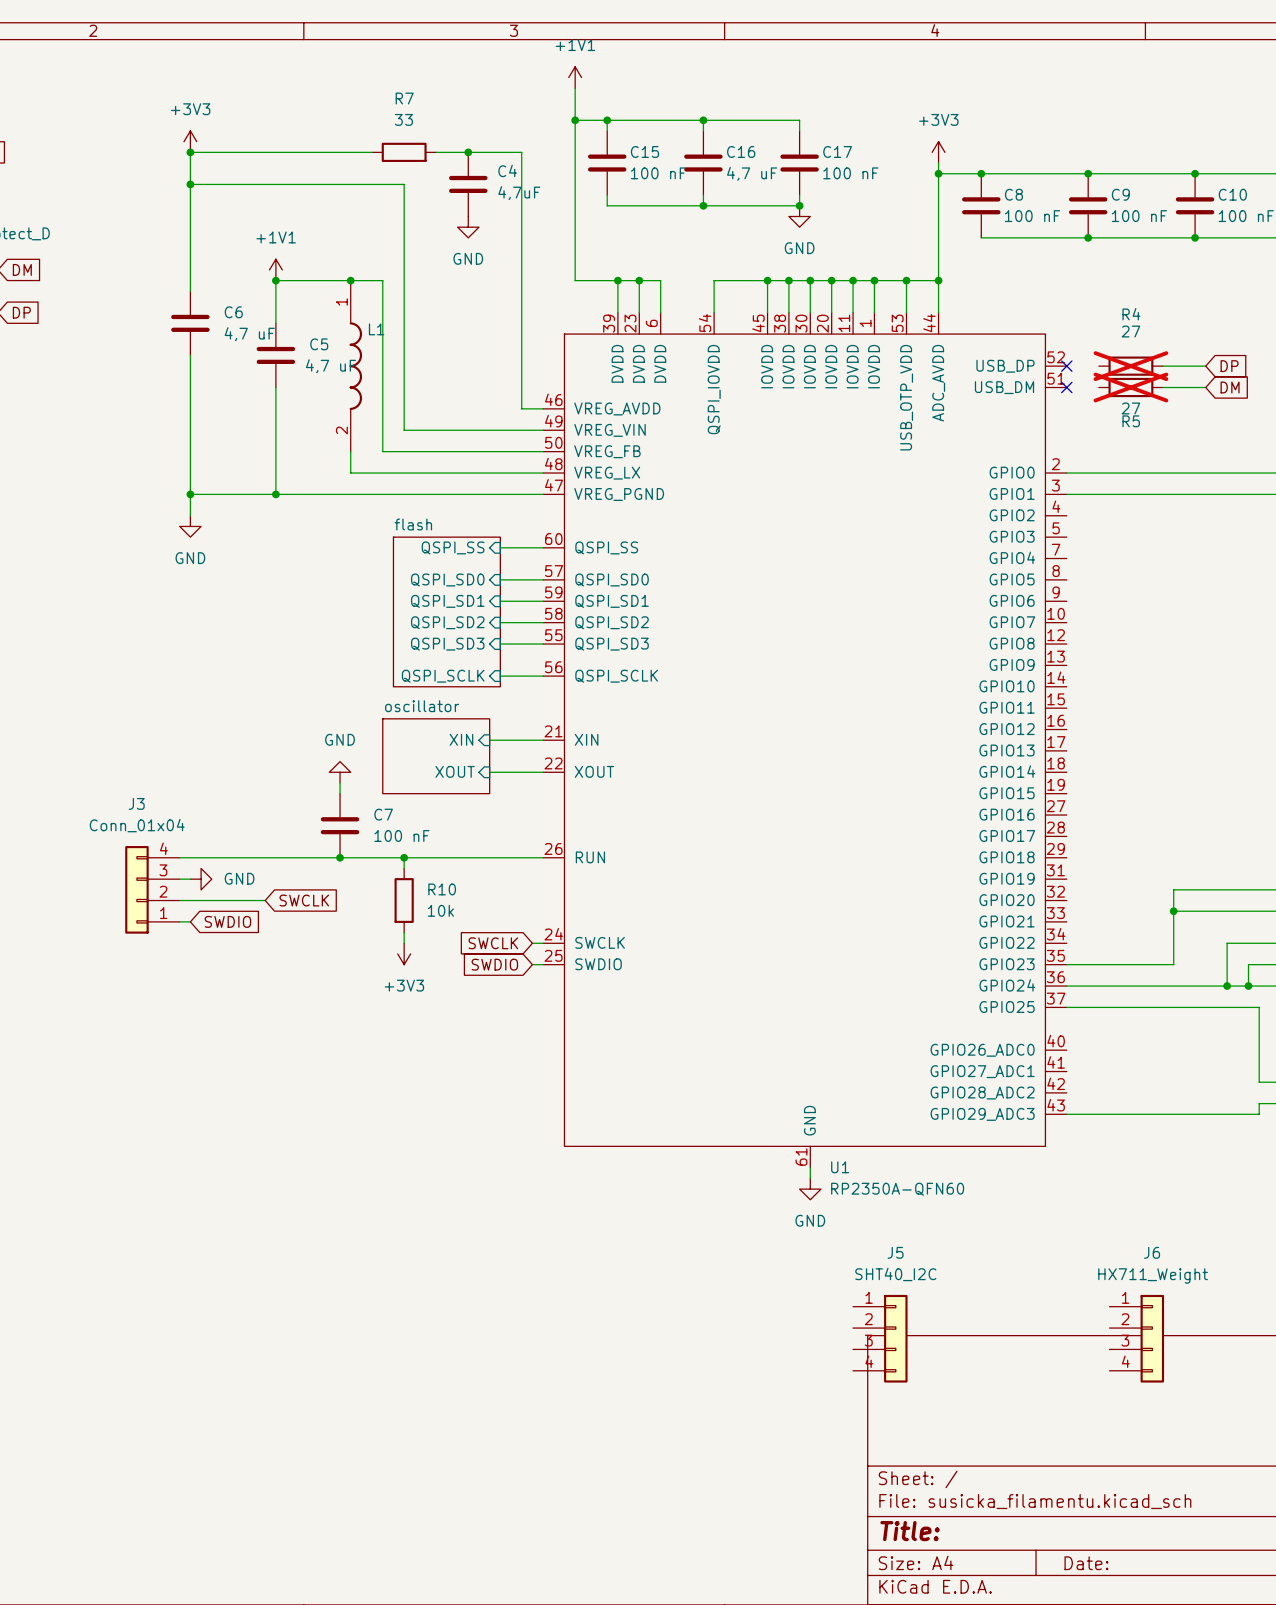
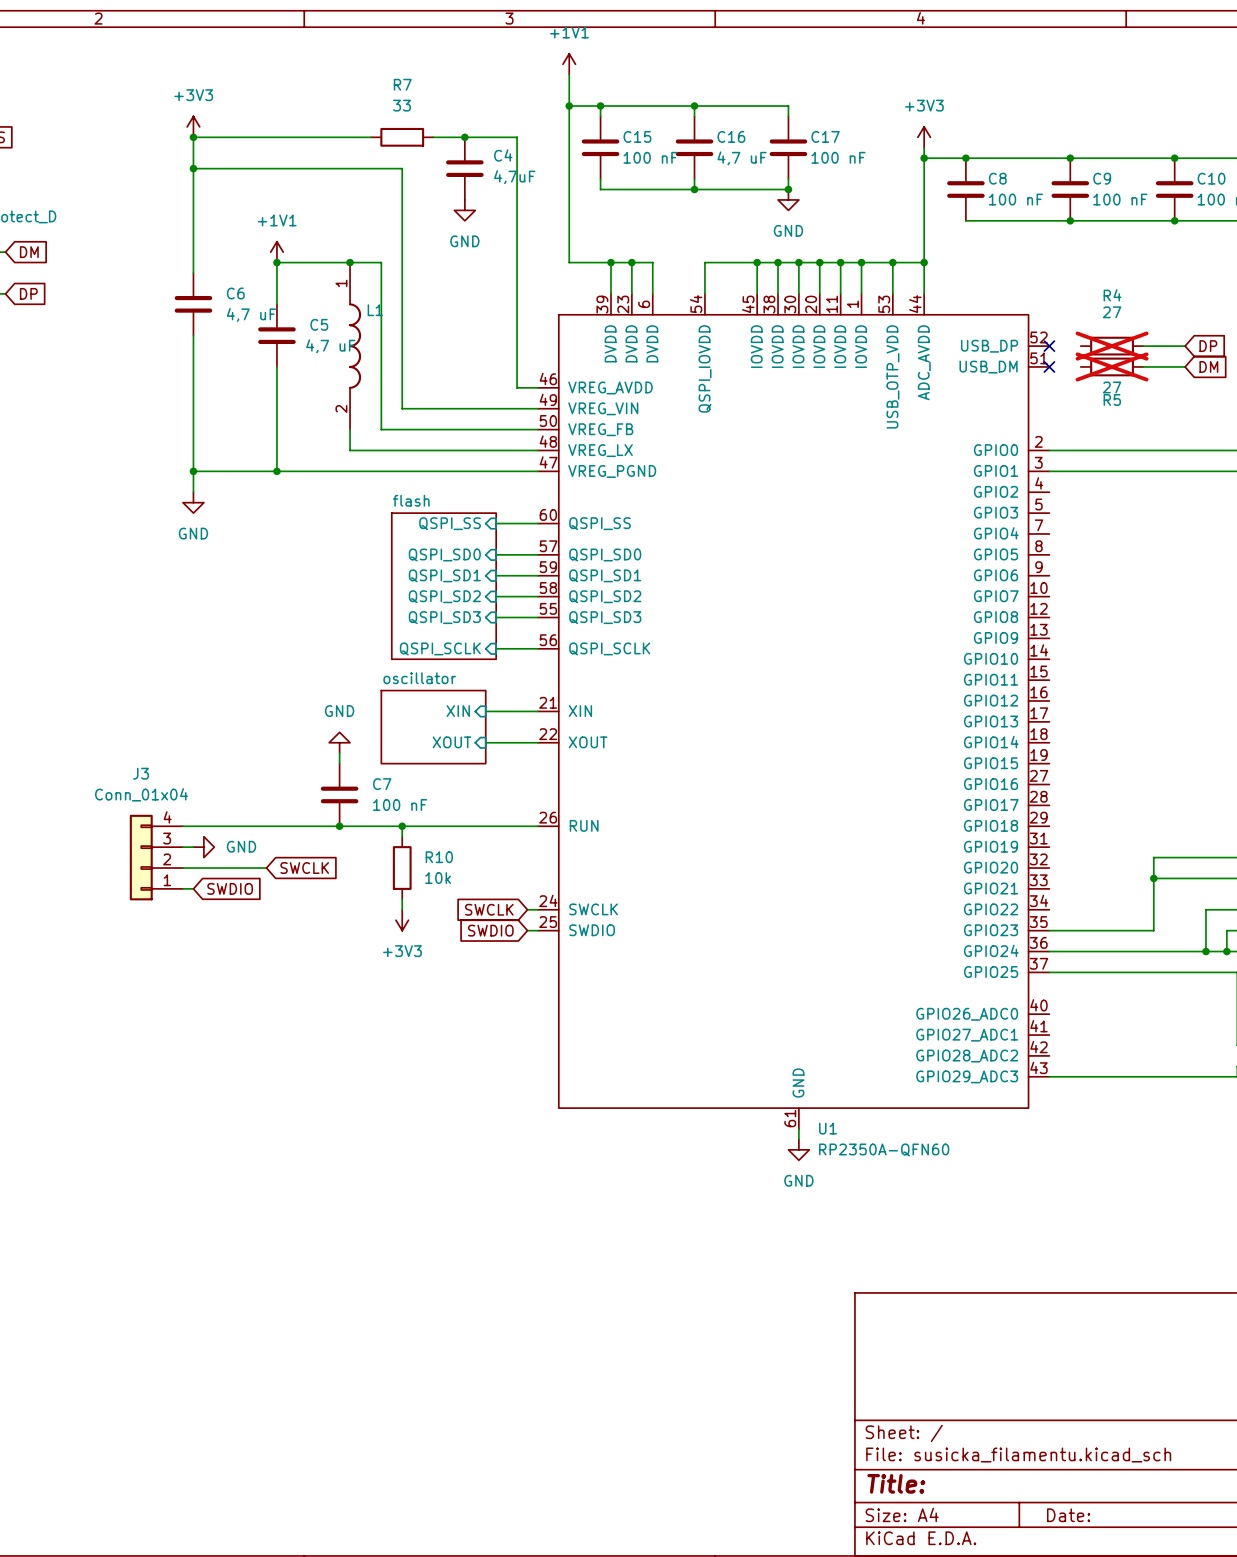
J5: SHT40_I2C (880, 1338) -> none
J6: HX711_Weight (1136, 1338) -> none

